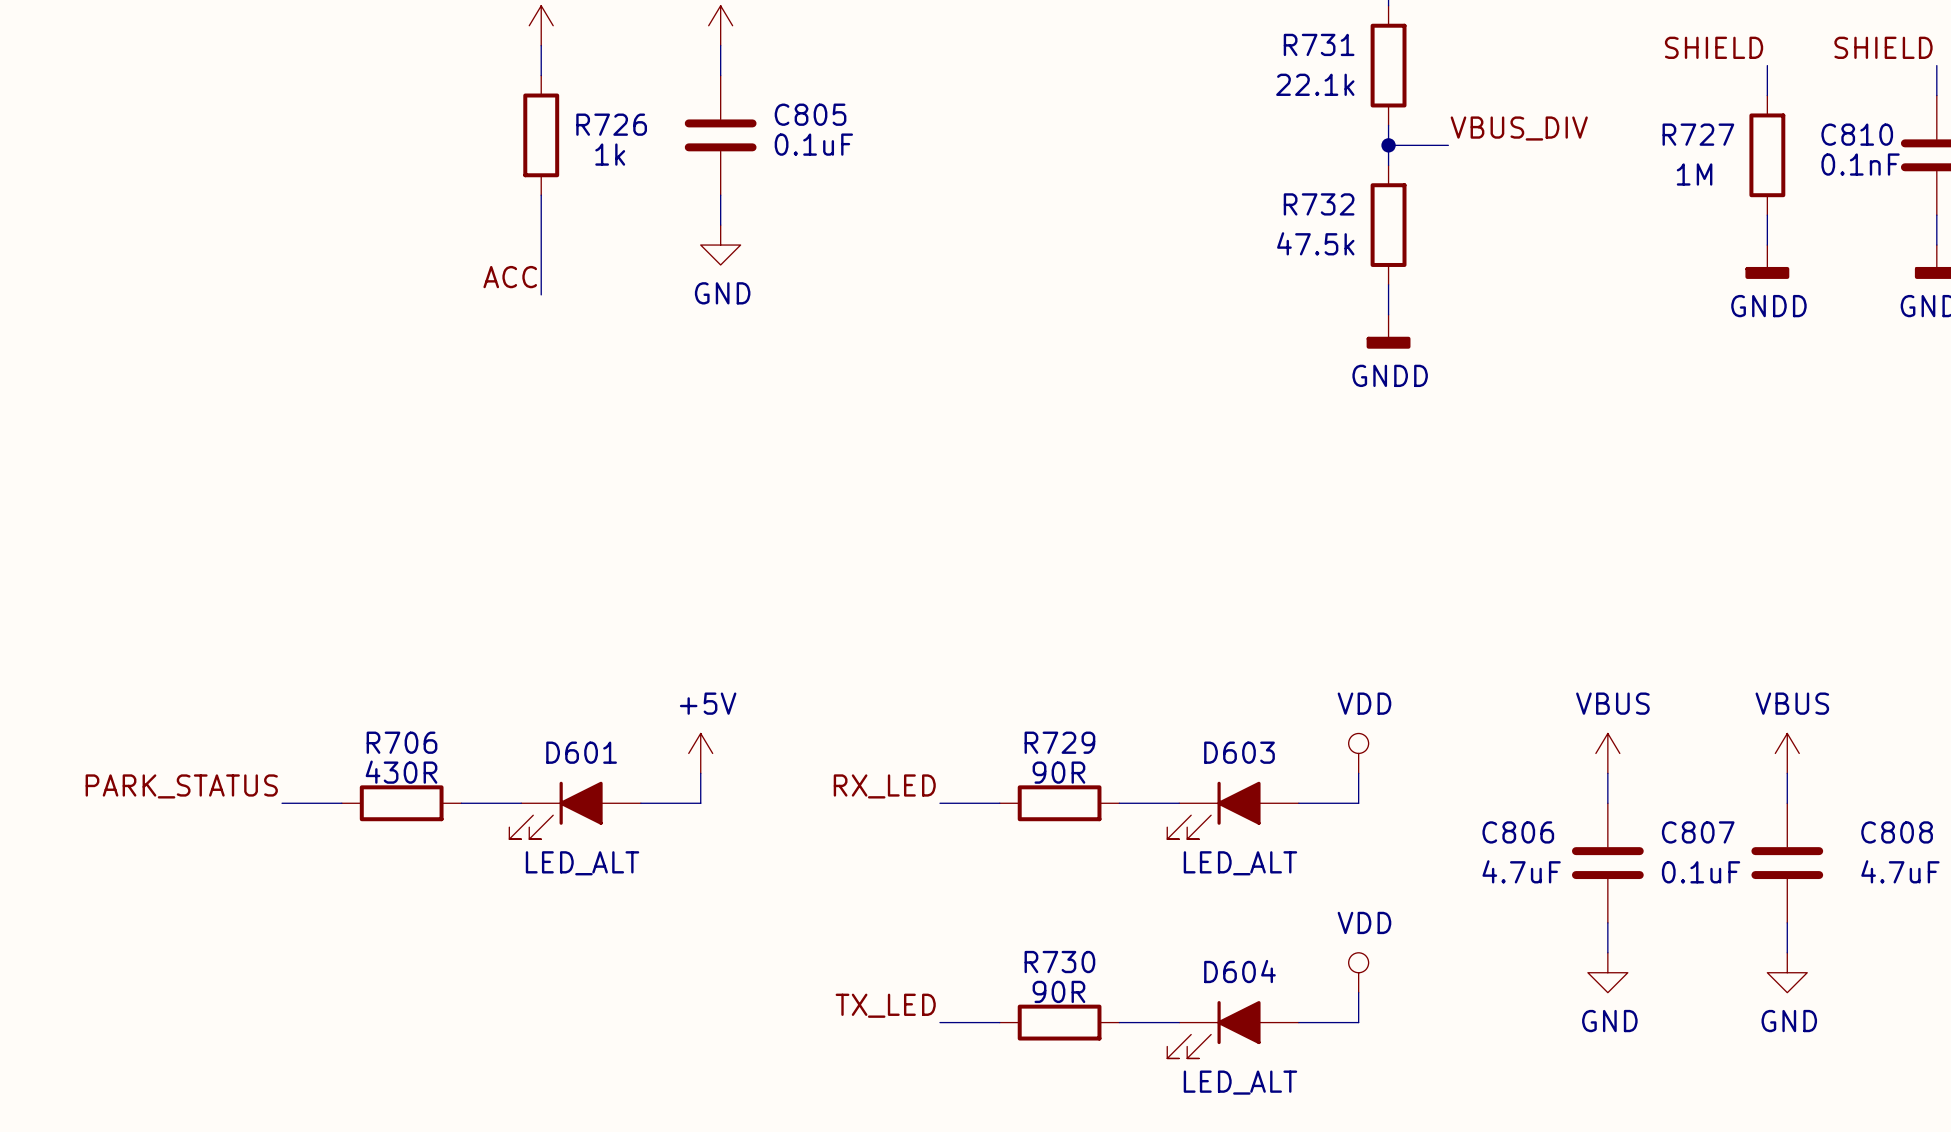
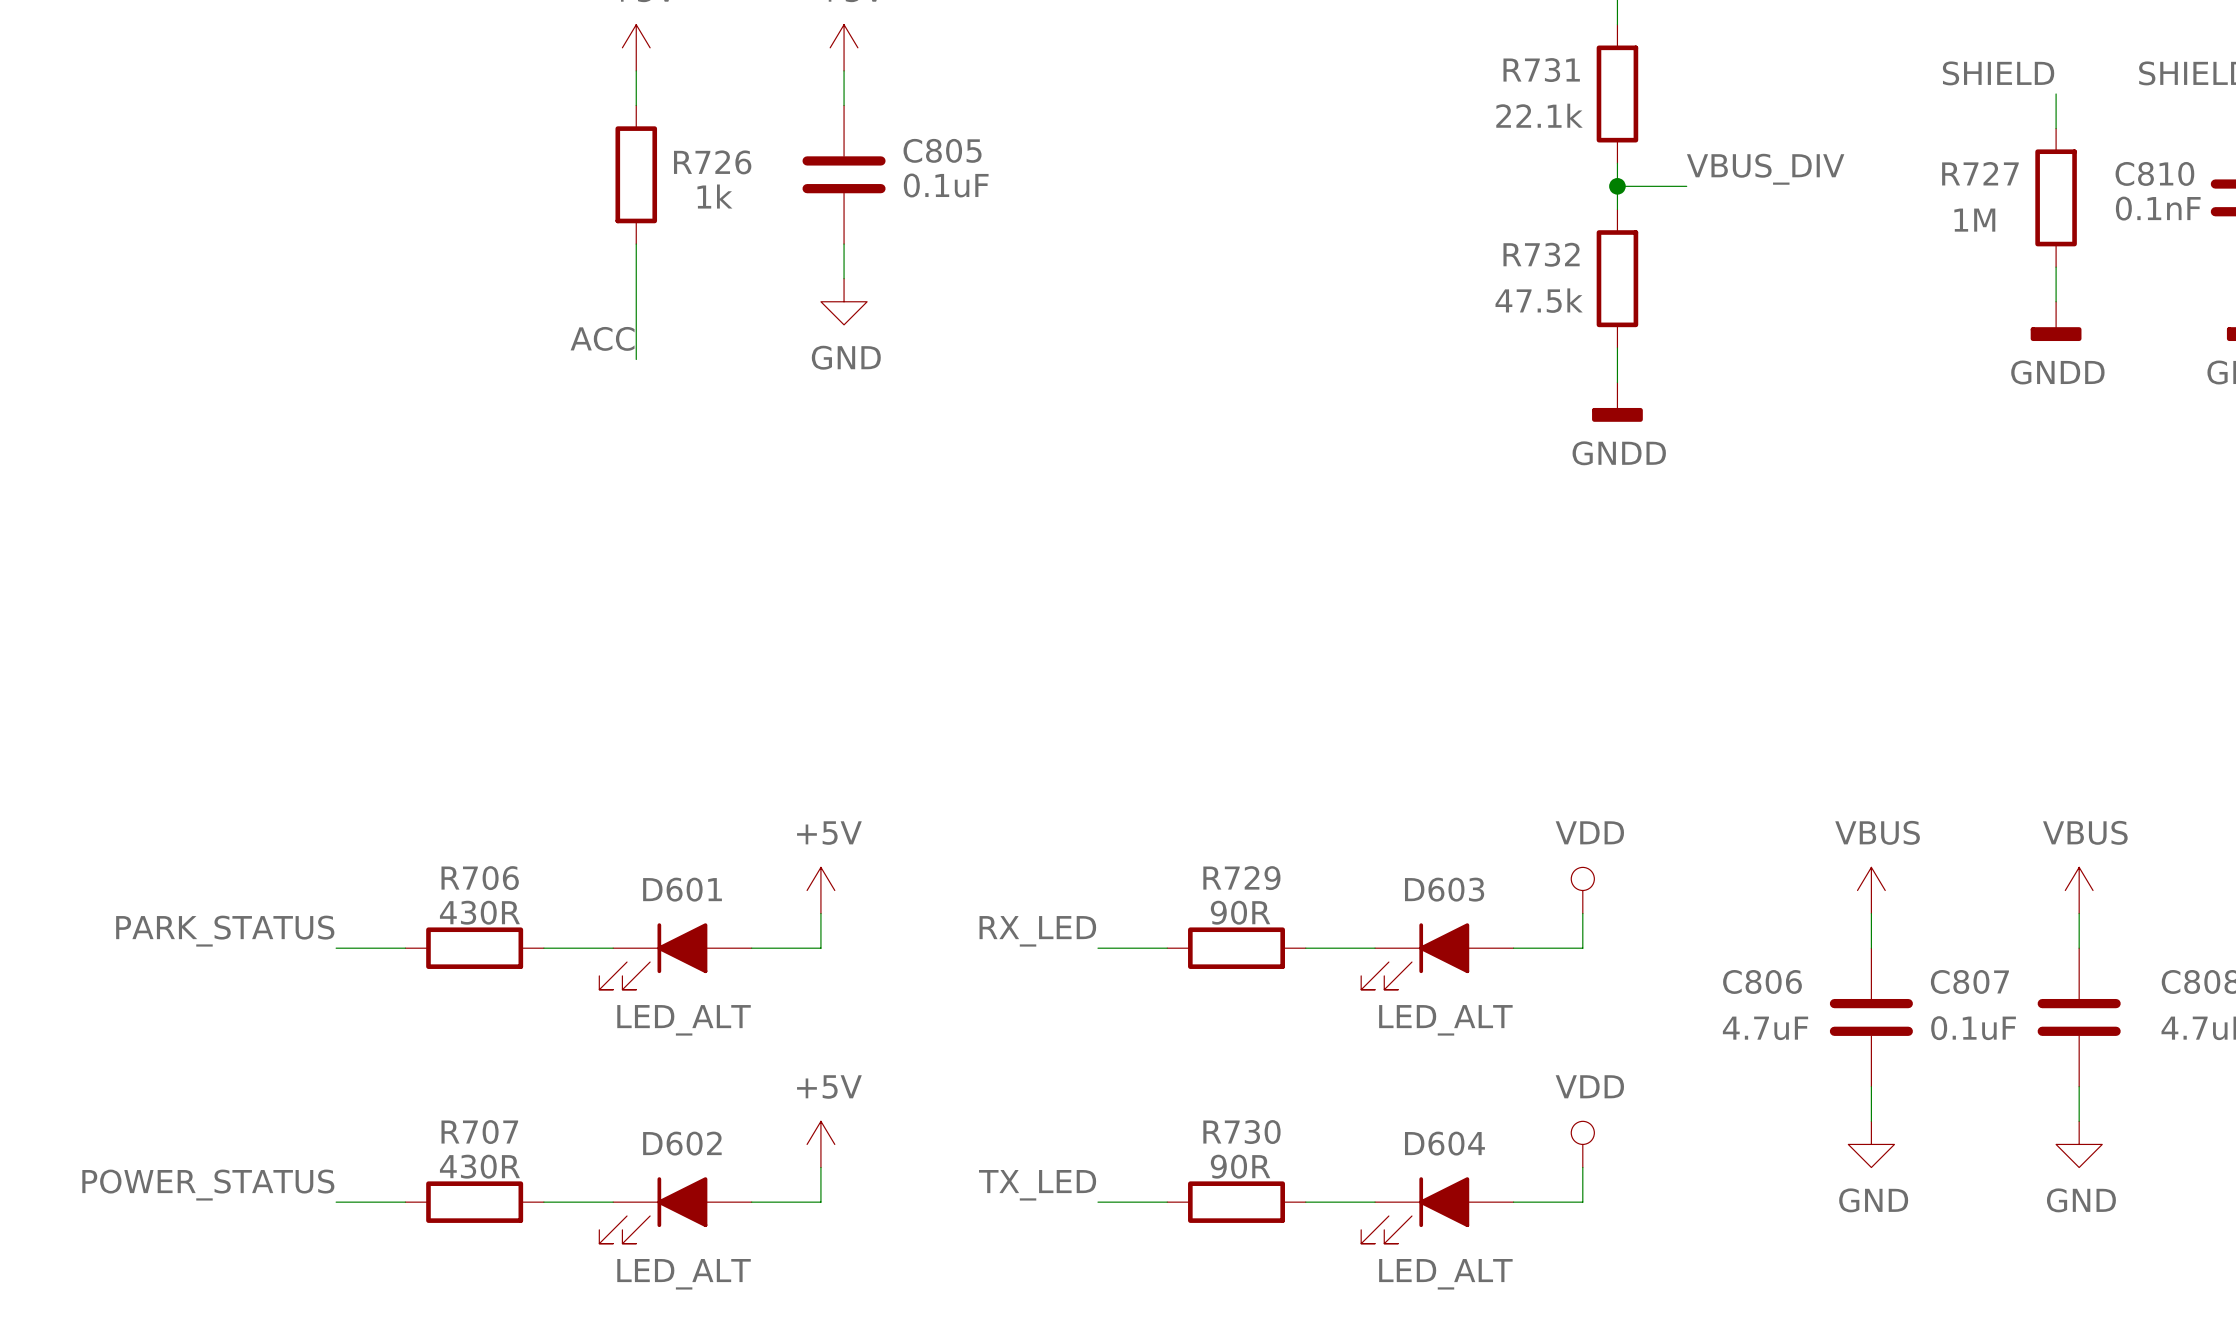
power symbol: none -> +5V (820, 1144)
wire: none -> (820, 1167) (820, 1202) (751, 1202)
label: none -> POWER_STATUS (208, 1185)
wire: none -> (336, 1202) (405, 1202)
R707: none -> 430R (474, 1202)
wire: none -> (543, 1202) (613, 1202)
D602: none -> LED_ALT (675, 1210)

